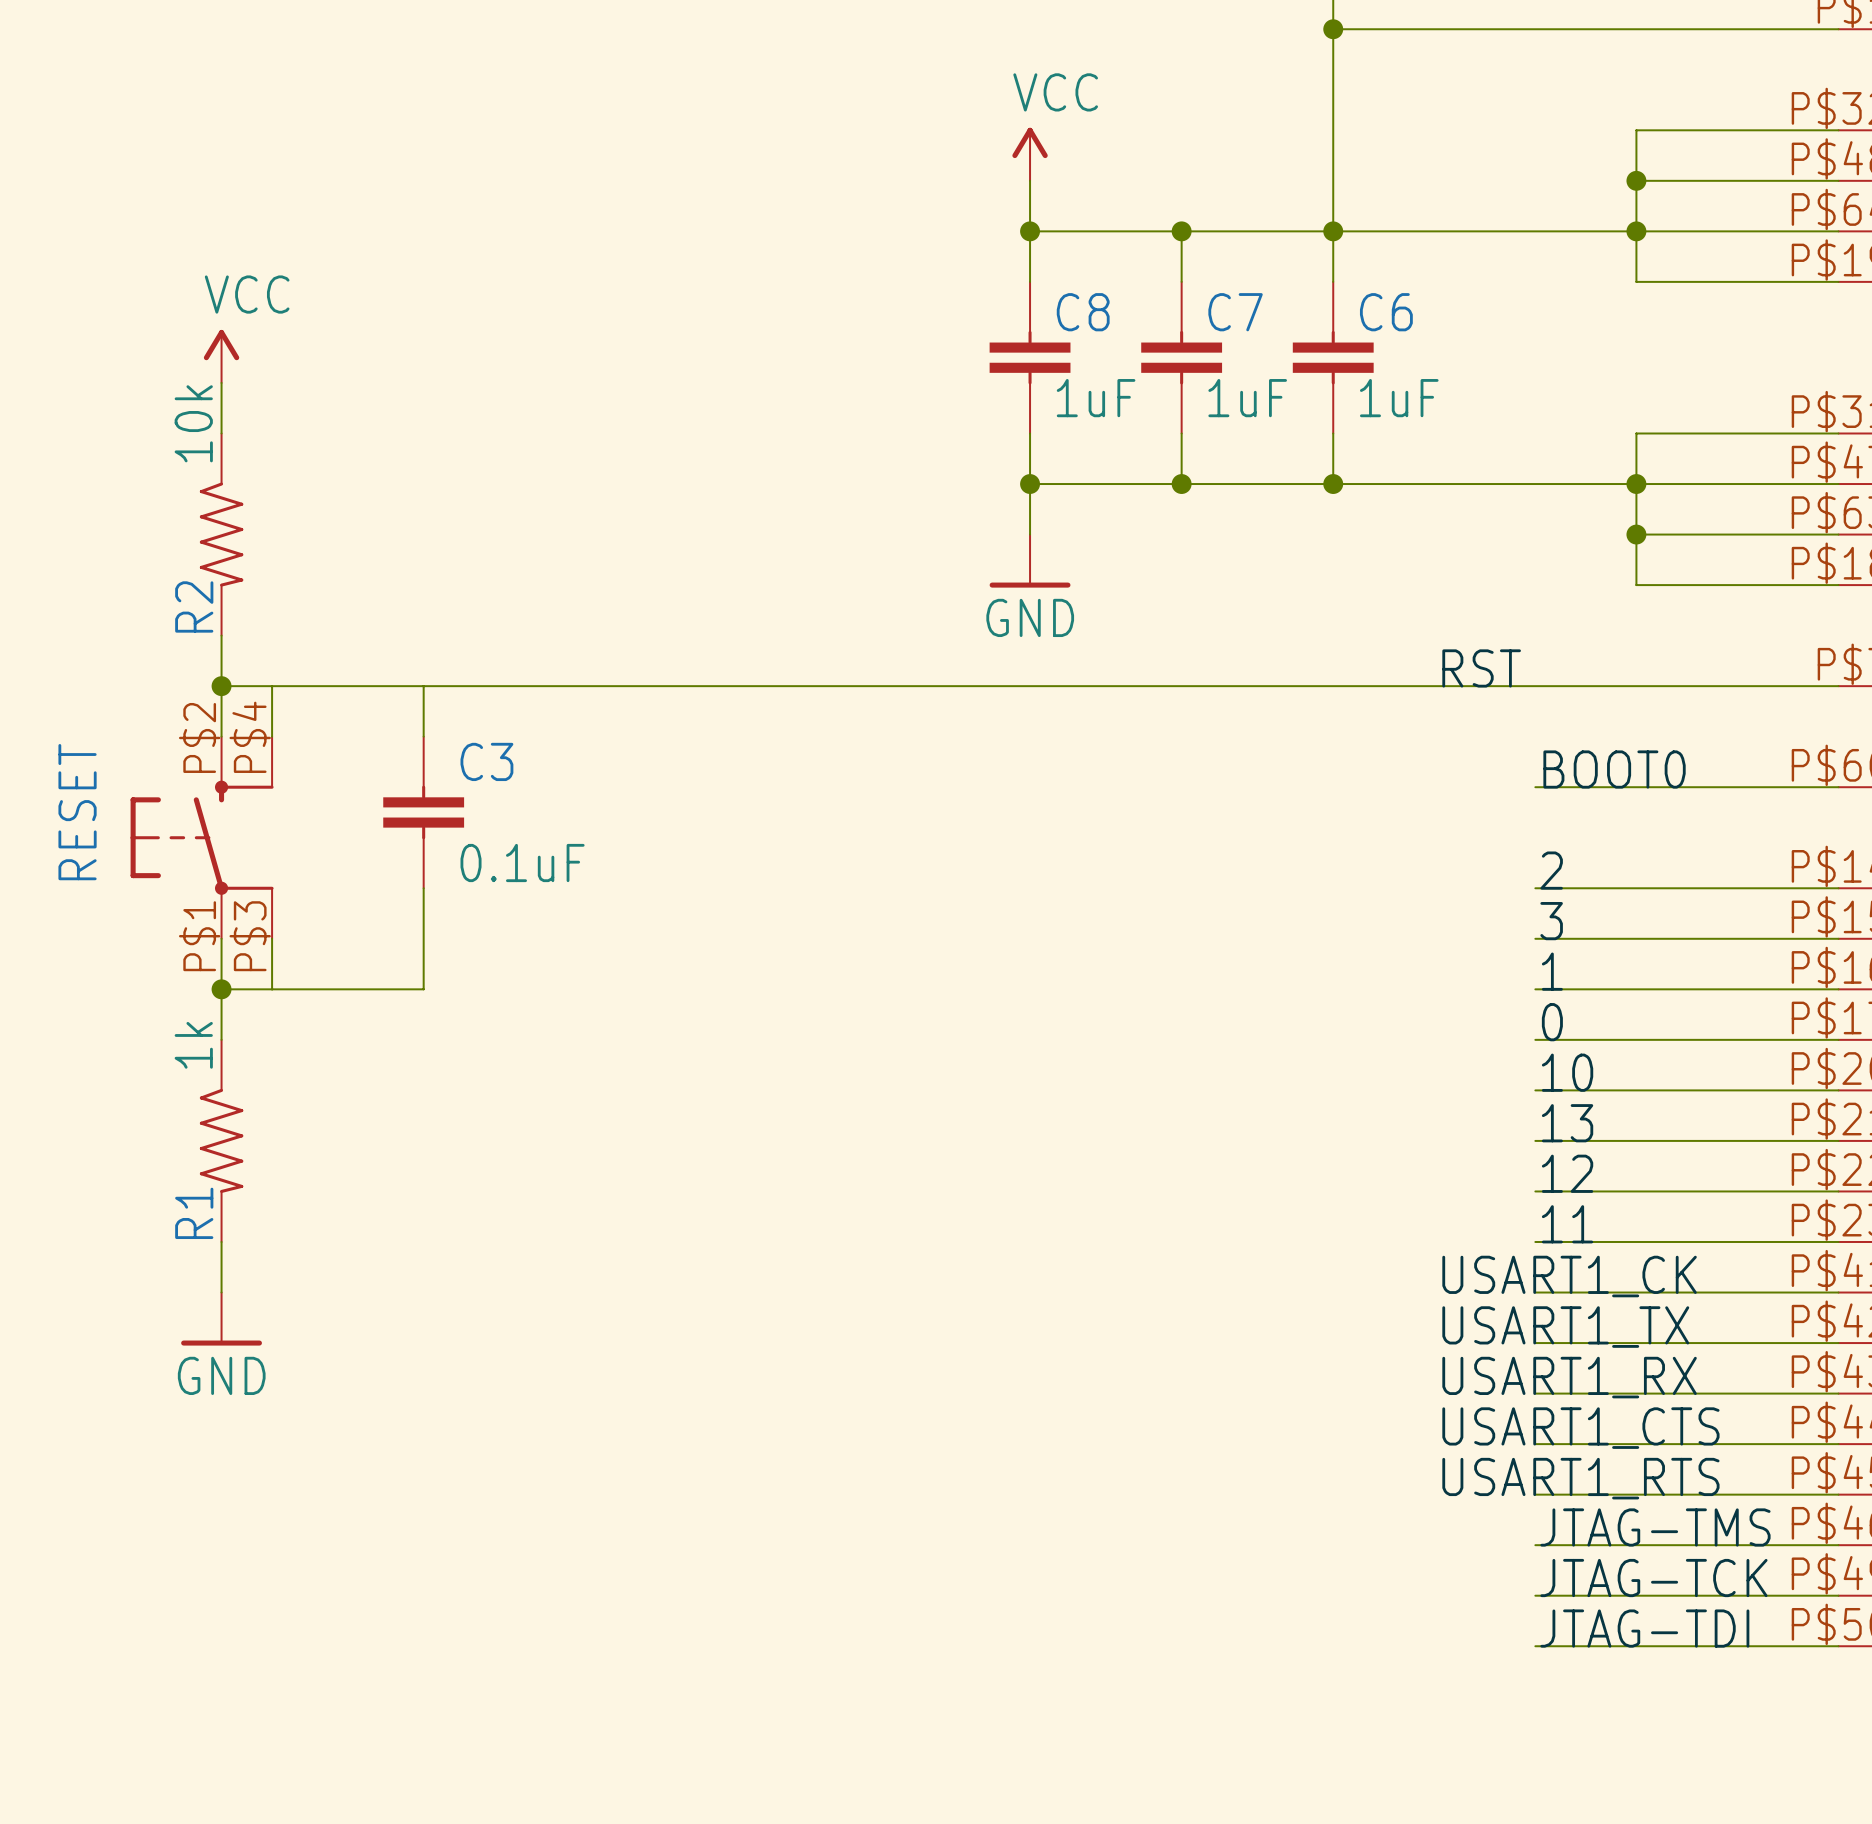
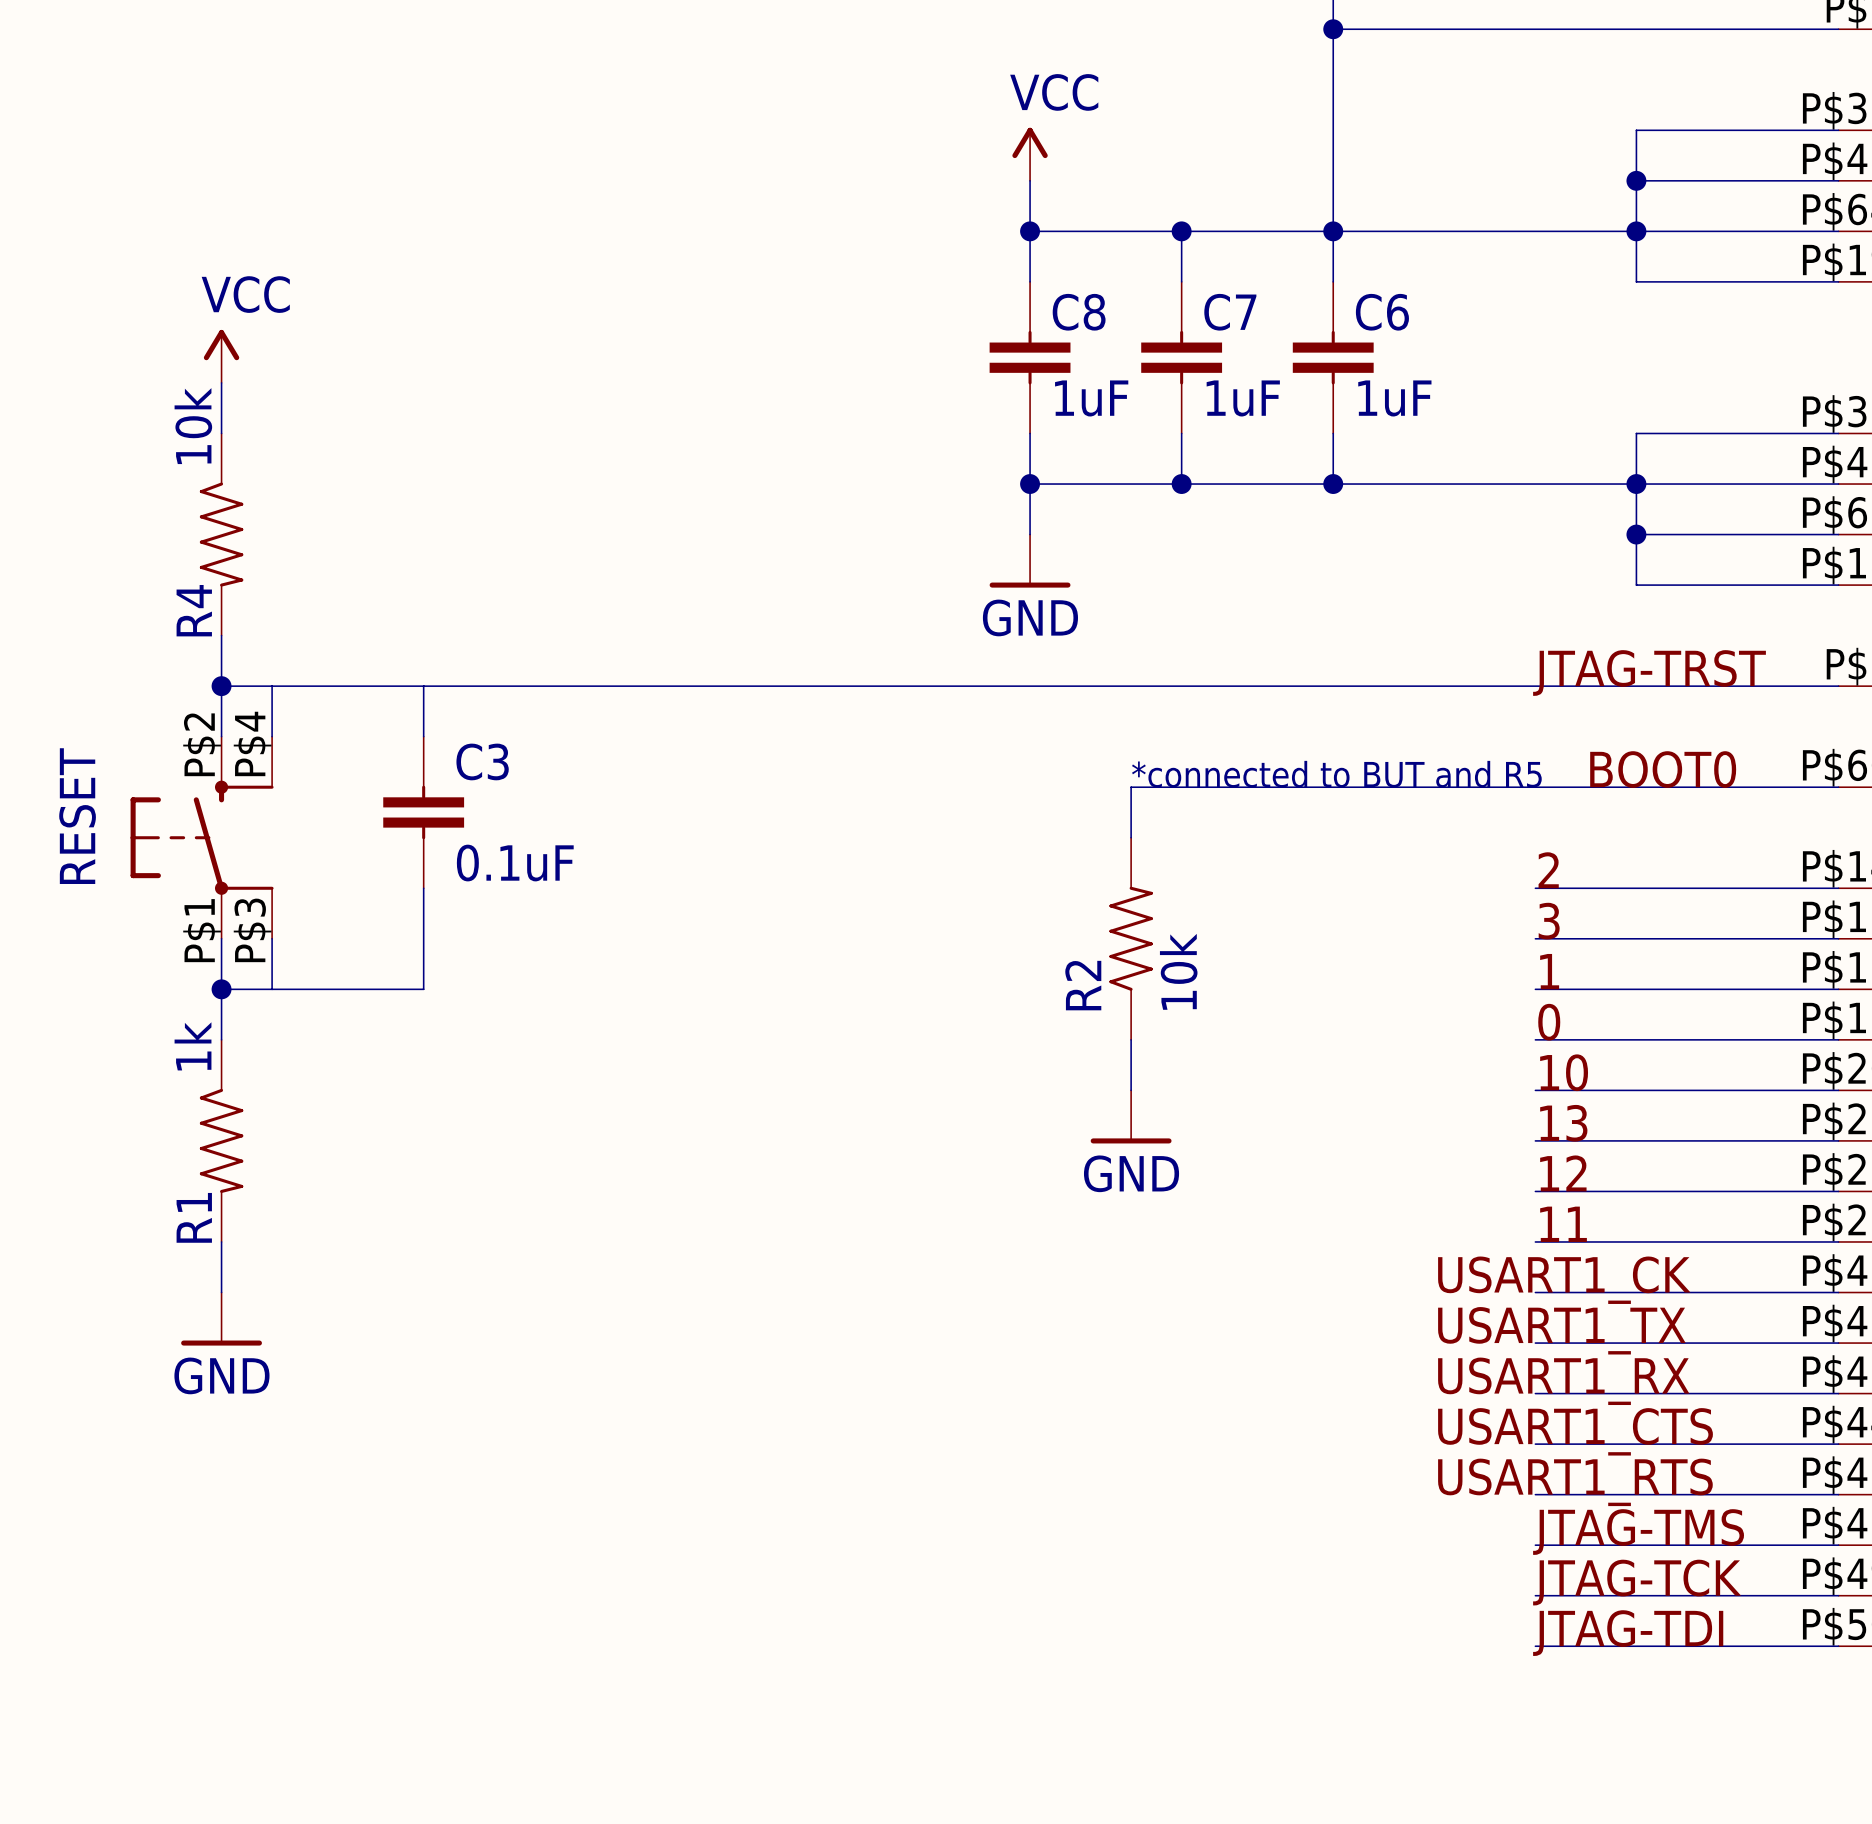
R2 name: R2 (194, 606) -> R4 (194, 610)
label: RST (1481, 668) -> none
label: none -> JTAG-TRST (1649, 672)
label position: BOOT0 (1614, 769) -> BOOT0 (1663, 769)
text: none -> *connected to BUT and R5 (1336, 774)
wire: none -> (1535, 787) (1131, 787) (1131, 837)
R2: none -> 10k (1131, 938)
wire: none -> (1131, 1039) (1131, 1090)
power symbol: none -> GND (1131, 1116)

